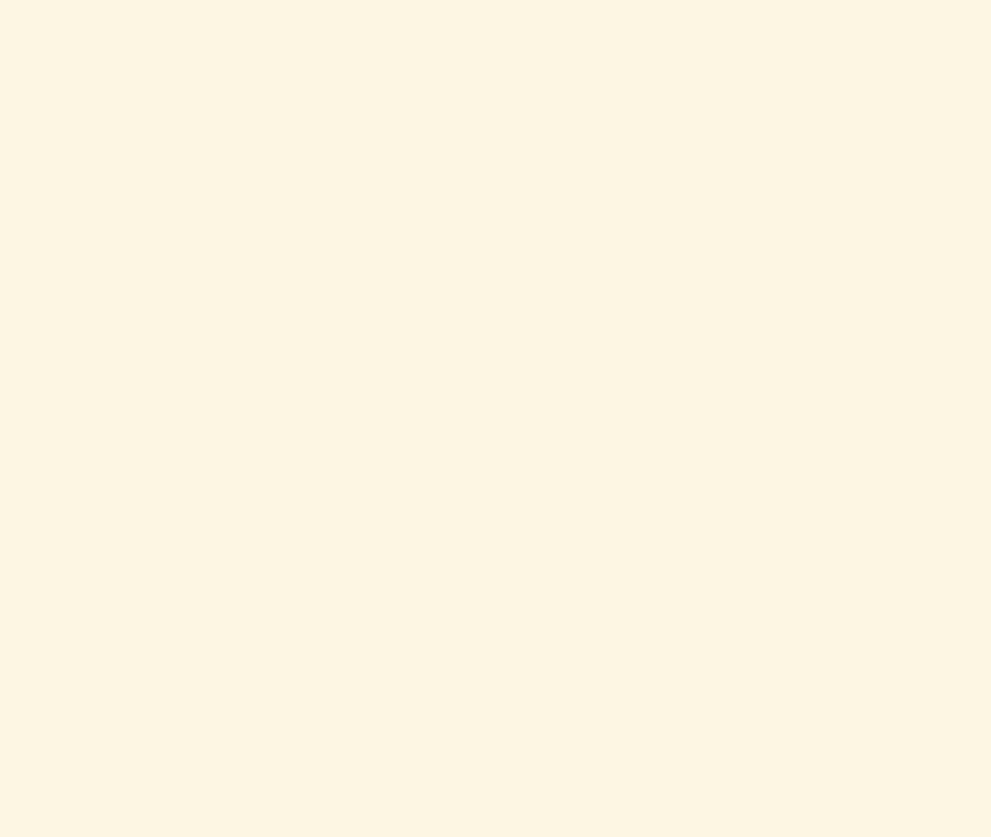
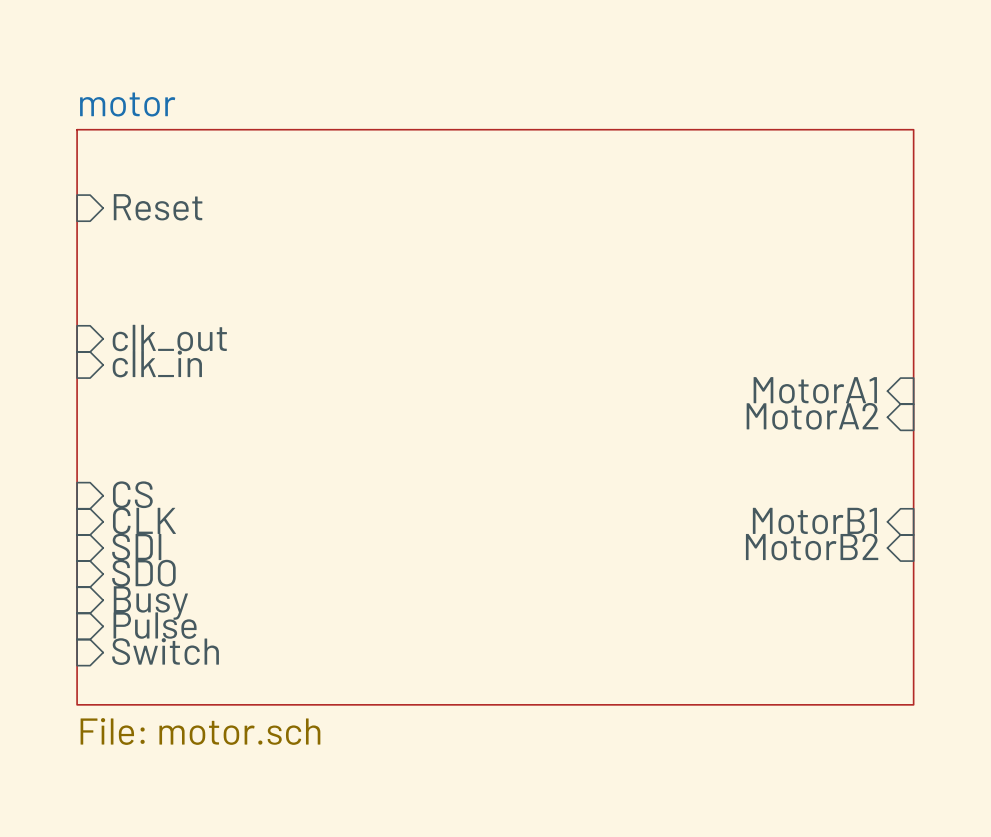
sheet pin: none -> Reset (158, 207)
sheet pin: none -> clk_out (169, 338)
sheet pin: none -> clk_in (157, 363)
sheet pin: none -> MotorA1 (815, 390)
sheet pin: none -> MotorA2 (812, 416)
sheet motor: none -> File: motor.sch (495, 417)
sheet pin: none -> CS (132, 494)
sheet pin: none -> CLK (144, 520)
sheet pin: none -> MotorB1 (814, 521)
sheet pin: none -> SDI (136, 547)
sheet pin: none -> MotorB2 (812, 547)
sheet pin: none -> SDO (143, 573)
sheet pin: none -> Busy (150, 603)
sheet pin: none -> Pulse (155, 625)
sheet pin: none -> Switch (165, 651)

